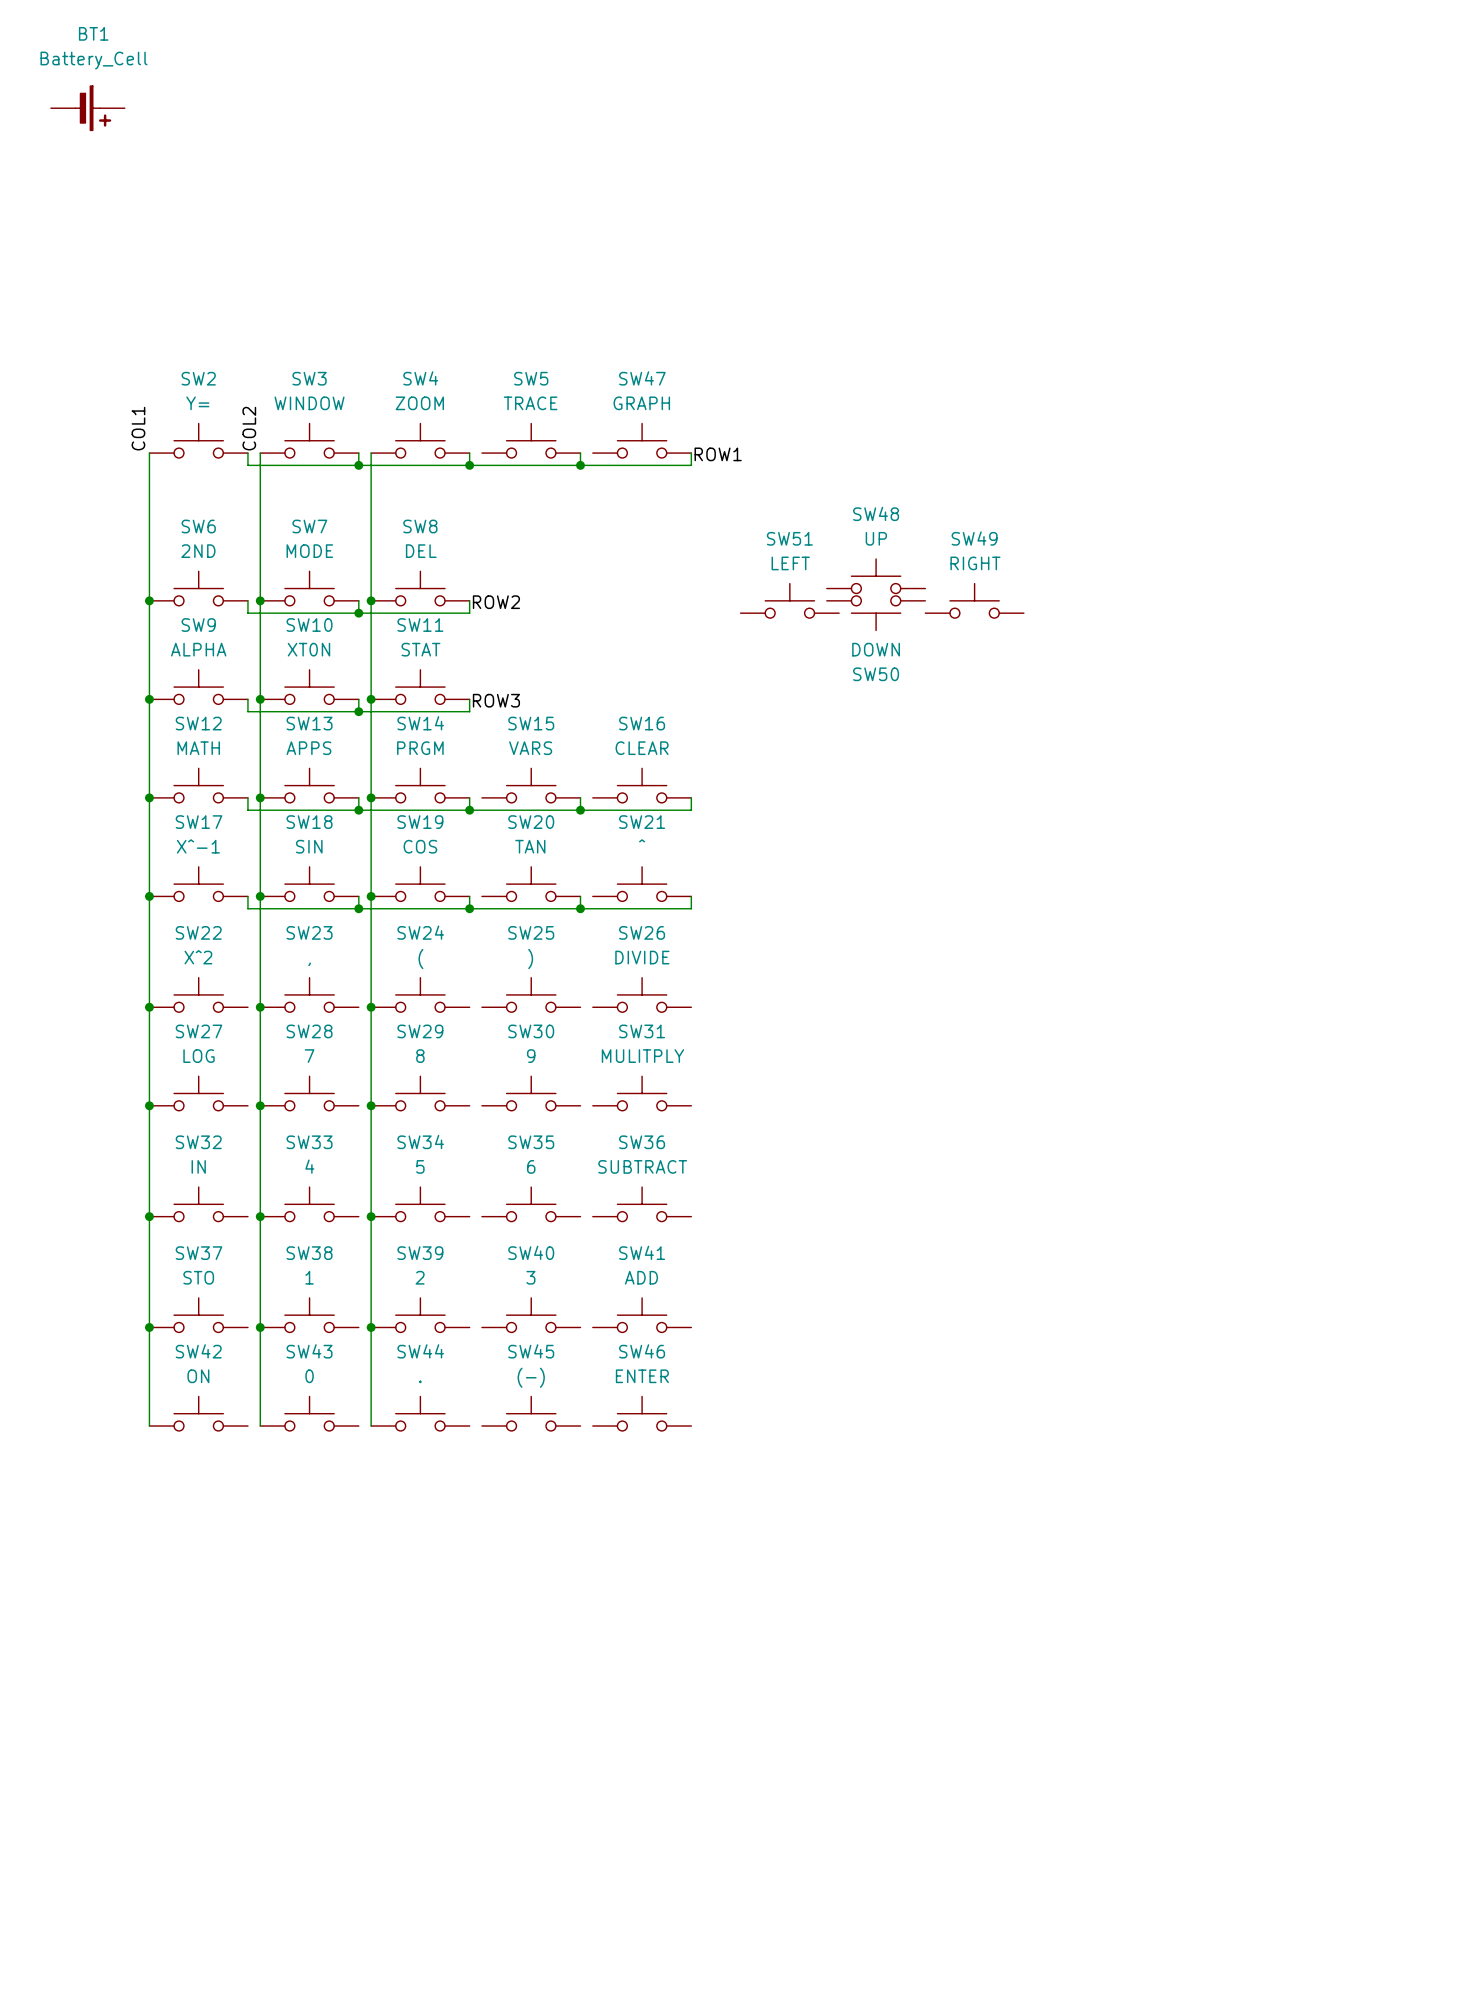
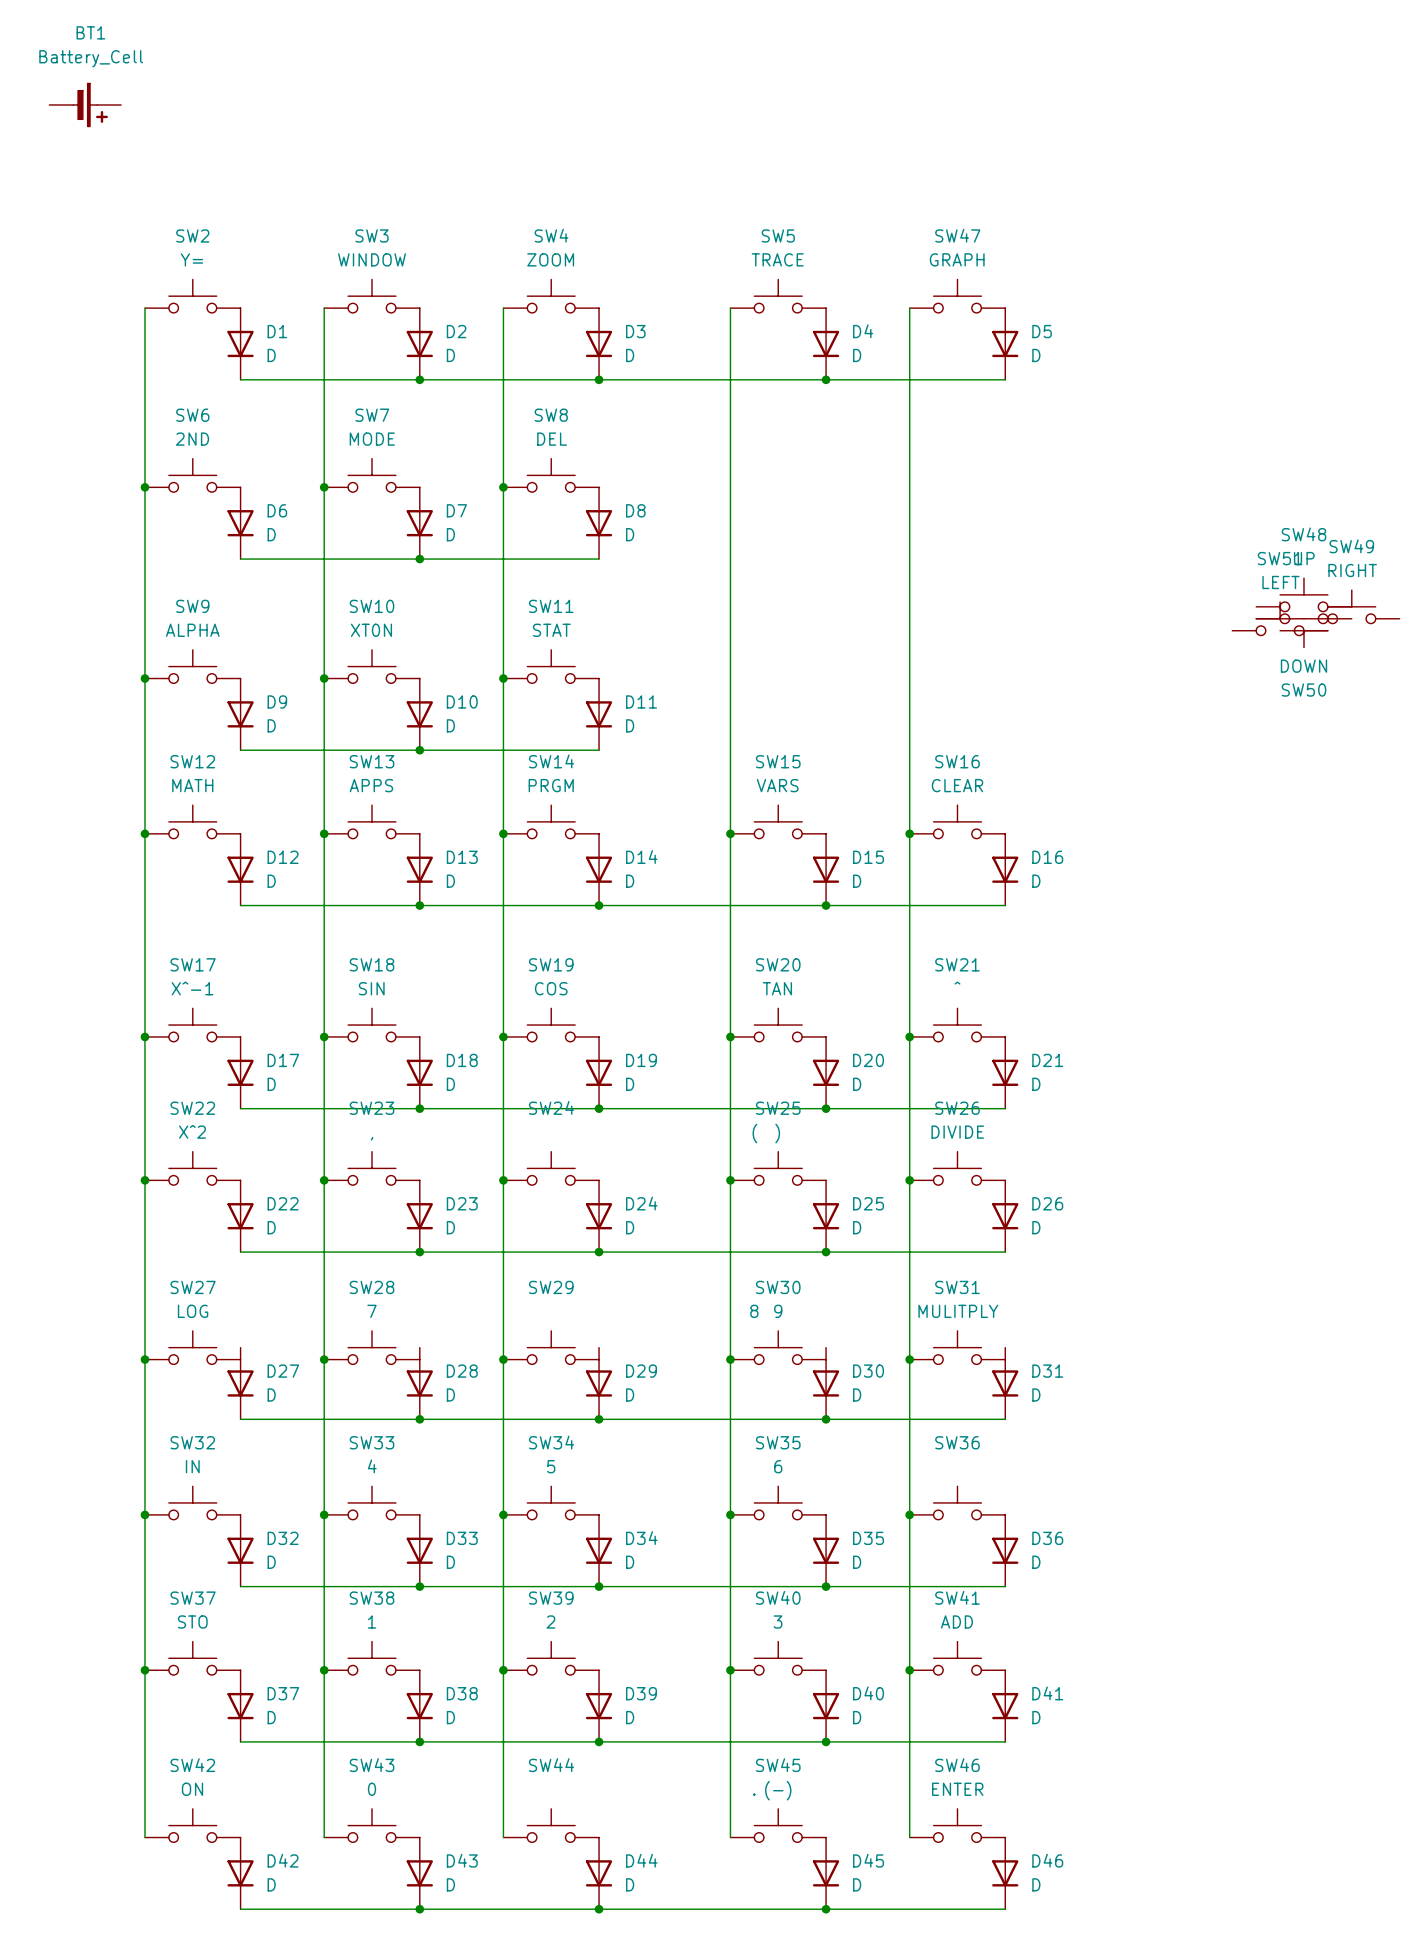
wire: none -> (144, 308) (144, 439)
wire: none -> (324, 308) (324, 1837)
wire: none -> (503, 308) (503, 1837)
wire: none -> (730, 308) (730, 1837)
wire: none -> (909, 308) (909, 1837)
D1: none -> D (240, 343)
D2: none -> D (419, 343)
D3: none -> D (599, 343)
D4: none -> D (826, 343)
D5: none -> D (1005, 343)
wire: none -> (240, 379) (1005, 379)
junction: none -> (419, 379)
junction: none -> (599, 379)
junction: none -> (826, 379)
label: COL1 (138, 428) -> none
label: COL2 (249, 428) -> none
SW2 position: (198, 440) -> (192, 296)
SW3 position: (309, 440) -> (372, 296)
SW4 position: (420, 440) -> (551, 296)
SW5 position: (531, 440) -> (778, 296)
SW47 position: (642, 440) -> (957, 296)
wire: (247, 453) (247, 465) (691, 465) (691, 453) -> none
wire: (260, 453) (260, 1426) -> none
wire: (358, 453) (358, 465) -> none
wire: (371, 453) (371, 1426) -> none
wire: (469, 453) (469, 465) -> none
wire: (580, 453) (580, 465) -> none
label: ROW1 (718, 454) -> none
junction position: (358, 465) -> (324, 487)
junction: (469, 465) -> none
junction: (580, 465) -> none
junction: none -> (144, 487)
junction: none -> (503, 487)
D6: none -> D (240, 523)
D7: none -> D (419, 523)
D8: none -> D (599, 523)
wire: none -> (240, 559) (599, 559)
junction: none -> (419, 559)
SW48 position: (876, 576) -> (1303, 594)
SW6 position: (198, 588) -> (192, 475)
SW7 position: (309, 588) -> (372, 475)
SW8 position: (420, 588) -> (551, 475)
junction: (149, 600) -> none
wire: (247, 600) (247, 613) (469, 613) (469, 600) -> none
junction: (260, 600) -> none
wire: (358, 600) (358, 613) -> none
junction: (371, 600) -> none
SW51 position: (789, 600) -> (1280, 618)
SW49 position: (974, 600) -> (1351, 606)
label: ROW2 (496, 602) -> none
junction: (358, 613) -> none
SW50 position: (876, 613) -> (1303, 630)
SW10 position: (309, 687) -> (372, 666)
SW11 position: (420, 687) -> (551, 666)
wire: (247, 699) (247, 711) (469, 711) (469, 699) -> none
junction: (260, 699) -> none
junction: none -> (324, 678)
wire: (358, 699) (358, 711) -> none
junction: (371, 699) -> none
junction: none -> (503, 678)
label: ROW3 (496, 700) -> none
junction: (358, 711) -> none
D9: none -> D (240, 714)
D10: none -> D (419, 714)
D11: none -> D (599, 714)
wire: none -> (240, 750) (599, 750)
junction: none -> (419, 750)
SW12 position: (198, 785) -> (192, 821)
SW13 position: (309, 785) -> (372, 821)
SW14 position: (420, 785) -> (551, 821)
SW15 position: (531, 785) -> (778, 821)
SW16 position: (642, 785) -> (957, 821)
junction: (149, 797) -> none
wire: (247, 797) (247, 810) (691, 810) (691, 797) -> none
junction: (260, 797) -> none
wire: (358, 797) (358, 810) -> none
junction: (371, 797) -> none
wire: (469, 797) (469, 810) -> none
wire: (580, 797) (580, 810) -> none
junction: (358, 810) -> none
junction: (469, 810) -> none
junction: (580, 810) -> none
junction: none -> (144, 833)
junction: none -> (324, 833)
junction: none -> (503, 833)
junction: none -> (730, 833)
junction: none -> (909, 833)
SW17 position: (198, 884) -> (192, 1025)
SW18 position: (309, 884) -> (372, 1025)
SW19 position: (420, 884) -> (551, 1025)
SW20 position: (531, 884) -> (778, 1025)
SW21 position: (642, 884) -> (957, 1025)
junction: (149, 896) -> none
wire: (247, 896) (247, 908) (691, 908) (691, 896) -> none
D12: none -> D (240, 869)
junction: (260, 896) -> none
wire: (358, 896) (358, 908) -> none
junction: (371, 896) -> none
D13: none -> D (419, 869)
wire: (469, 896) (469, 908) -> none
wire: (580, 896) (580, 908) -> none
D14: none -> D (599, 869)
D15: none -> D (826, 869)
D16: none -> D (1005, 869)
junction: (358, 908) -> none
junction: (469, 908) -> none
junction: (580, 908) -> none
wire: none -> (240, 905) (1005, 905)
junction: none -> (419, 905)
junction: none -> (599, 905)
junction: none -> (826, 905)
SW24 value position: ( (420, 959) -> ( (754, 1133)
SW22: X^2 (198, 994) -> none
SW23 position: (309, 994) -> (372, 1168)
SW24 position: (420, 994) -> (551, 1168)
SW25 position: (531, 994) -> (778, 1168)
SW26 position: (642, 994) -> (957, 1168)
junction: (149, 1007) -> none
junction: (260, 1007) -> none
junction: (371, 1007) -> none
SW29 value position: 8 (420, 1056) -> 8 (754, 1311)
junction: none -> (144, 1036)
junction: none -> (324, 1036)
junction: none -> (503, 1036)
junction: none -> (730, 1036)
junction: none -> (909, 1036)
SW27 position: (198, 1093) -> (192, 1347)
SW28 position: (309, 1093) -> (372, 1347)
SW29 position: (420, 1093) -> (551, 1347)
SW30 position: (531, 1093) -> (778, 1347)
SW31 position: (642, 1093) -> (957, 1347)
junction: (149, 1105) -> none
D17: none -> D (240, 1072)
junction: (260, 1105) -> none
junction: (371, 1105) -> none
D18: none -> D (419, 1072)
D19: none -> D (599, 1072)
D20: none -> D (826, 1072)
D21: none -> D (1005, 1072)
SW32 name: SW32 (198, 1142) -> SW22 (192, 1108)
wire: none -> (240, 1108) (1005, 1108)
junction: none -> (419, 1108)
junction: none -> (599, 1108)
junction: none -> (826, 1108)
SW32 value: IN (198, 1166) -> X^2 (192, 1131)
SW36 value: SUBTRACT (642, 1166) -> none
SW33 position: (309, 1204) -> (372, 1502)
SW34 position: (420, 1204) -> (551, 1502)
SW35 position: (531, 1204) -> (778, 1502)
SW36 position: (642, 1204) -> (957, 1502)
junction: (260, 1216) -> none
junction: none -> (324, 1180)
junction: (371, 1216) -> none
junction: none -> (503, 1180)
junction: none -> (730, 1180)
junction: none -> (909, 1180)
D22: none -> D (240, 1216)
D23: none -> D (419, 1216)
D24: none -> D (599, 1216)
D25: none -> D (826, 1216)
D26: none -> D (1005, 1216)
wire: none -> (240, 1252) (1005, 1252)
junction: none -> (419, 1252)
junction: none -> (599, 1252)
junction: none -> (826, 1252)
SW37 position: (198, 1315) -> (192, 1658)
SW38 position: (309, 1315) -> (372, 1658)
SW39 position: (420, 1315) -> (551, 1658)
SW40 position: (531, 1315) -> (778, 1658)
SW41 position: (642, 1315) -> (957, 1658)
junction: (149, 1327) -> none
junction: (260, 1327) -> none
junction: (371, 1327) -> none
SW44 value position: . (420, 1381) -> . (754, 1794)
junction: none -> (144, 1359)
junction: none -> (324, 1359)
junction: none -> (503, 1359)
junction: none -> (730, 1359)
junction: none -> (909, 1359)
SW42 position: (198, 1413) -> (192, 1825)
SW43 position: (309, 1413) -> (372, 1825)
SW44 position: (420, 1413) -> (551, 1825)
SW45 position: (531, 1413) -> (778, 1825)
SW46 position: (642, 1413) -> (957, 1825)
wire: none -> (144, 1383) (144, 1837)
D27: none -> D (240, 1383)
D28: none -> D (419, 1383)
D29: none -> D (599, 1383)
D30: none -> D (826, 1383)
D31: none -> D (1005, 1383)
wire: none -> (240, 1419) (1005, 1419)
junction: none -> (419, 1419)
junction: none -> (599, 1419)
junction: none -> (826, 1419)
SW32: none -> IN (192, 1502)
junction: none -> (144, 1514)
junction: none -> (324, 1514)
junction: none -> (503, 1514)
junction: none -> (730, 1514)
junction: none -> (909, 1514)
D32: none -> D (240, 1550)
D33: none -> D (419, 1550)
D34: none -> D (599, 1550)
D35: none -> D (826, 1550)
D36: none -> D (1005, 1550)
wire: none -> (240, 1586) (1005, 1586)
junction: none -> (419, 1586)
junction: none -> (599, 1586)
junction: none -> (826, 1586)
junction: none -> (144, 1670)
junction: none -> (324, 1670)
junction: none -> (503, 1670)
junction: none -> (730, 1670)
junction: none -> (909, 1670)
D37: none -> D (240, 1706)
D38: none -> D (419, 1706)
D39: none -> D (599, 1706)
D40: none -> D (826, 1706)
D41: none -> D (1005, 1706)
wire: none -> (240, 1741) (1005, 1741)
junction: none -> (419, 1741)
junction: none -> (599, 1741)
junction: none -> (826, 1741)
D42: none -> D (240, 1873)
D43: none -> D (419, 1873)
D44: none -> D (599, 1873)
D45: none -> D (826, 1873)
D46: none -> D (1005, 1873)
wire: none -> (240, 1909) (1005, 1909)
junction: none -> (419, 1909)
junction: none -> (599, 1909)
junction: none -> (826, 1909)

